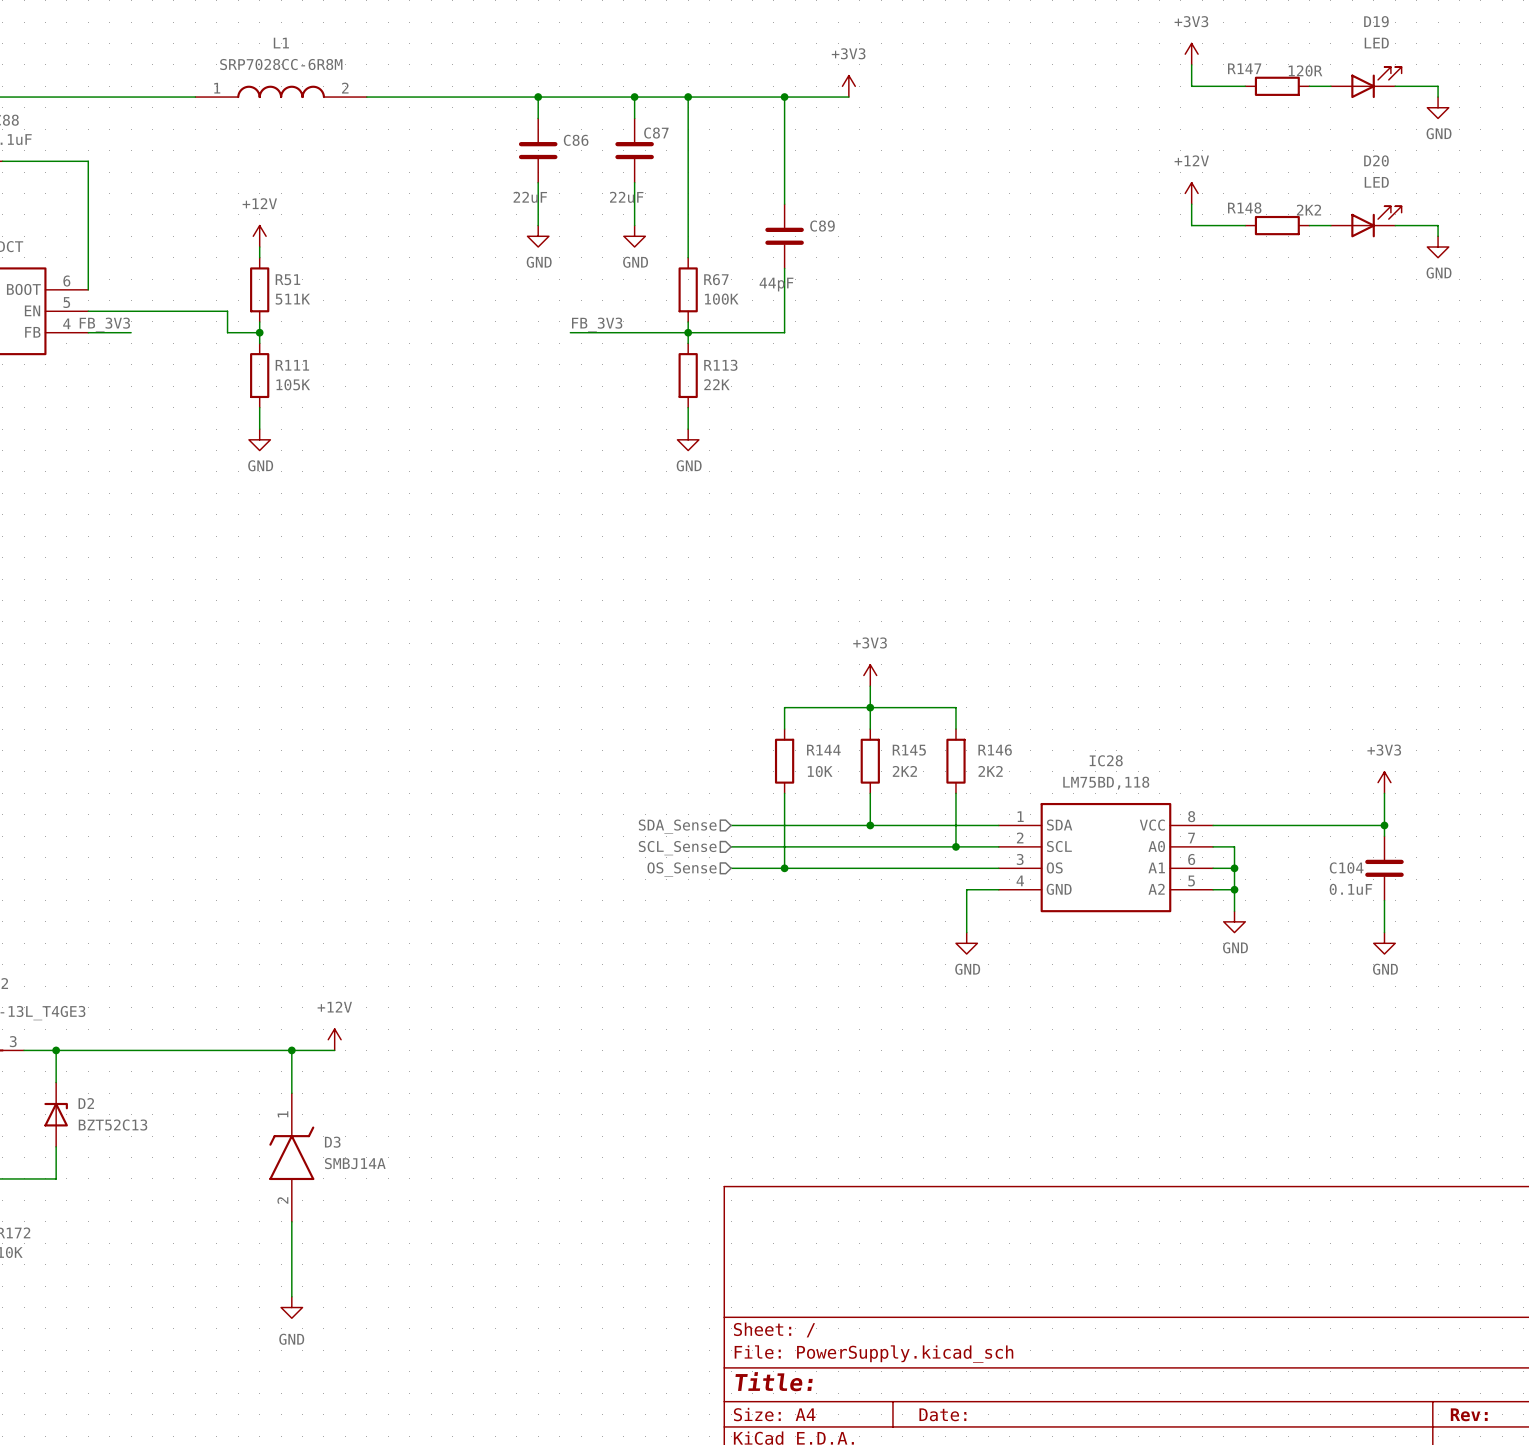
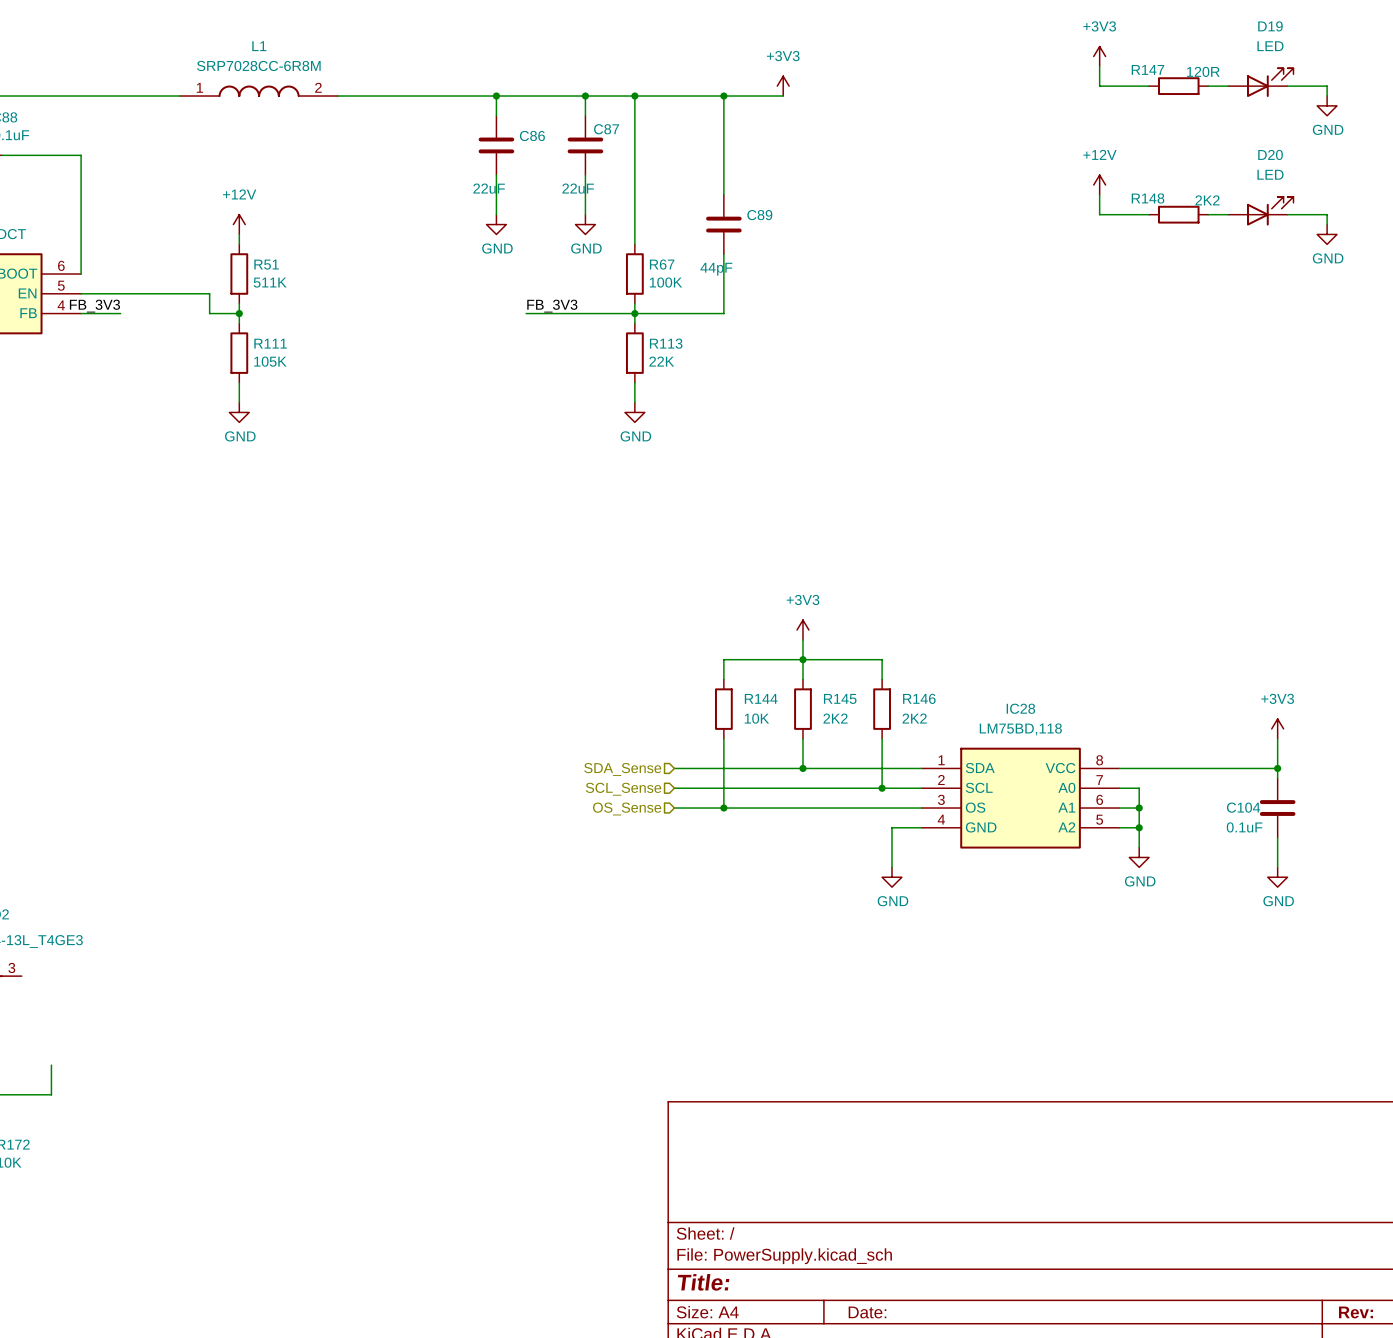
power symbol: +12V (334, 1039) -> none
wire: (24, 1050) (334, 1050) -> none
wire: (56, 1050) (56, 1082) -> none
junction: (56, 1050) -> none
wire: (291, 1050) (291, 1093) -> none
junction: (291, 1050) -> none
D2: BZT52C13 (56, 1114) -> none
D3: SMBJ14A (291, 1157) -> none
wire: (291, 1221) (291, 1296) -> none
power symbol: GND (291, 1307) -> none

